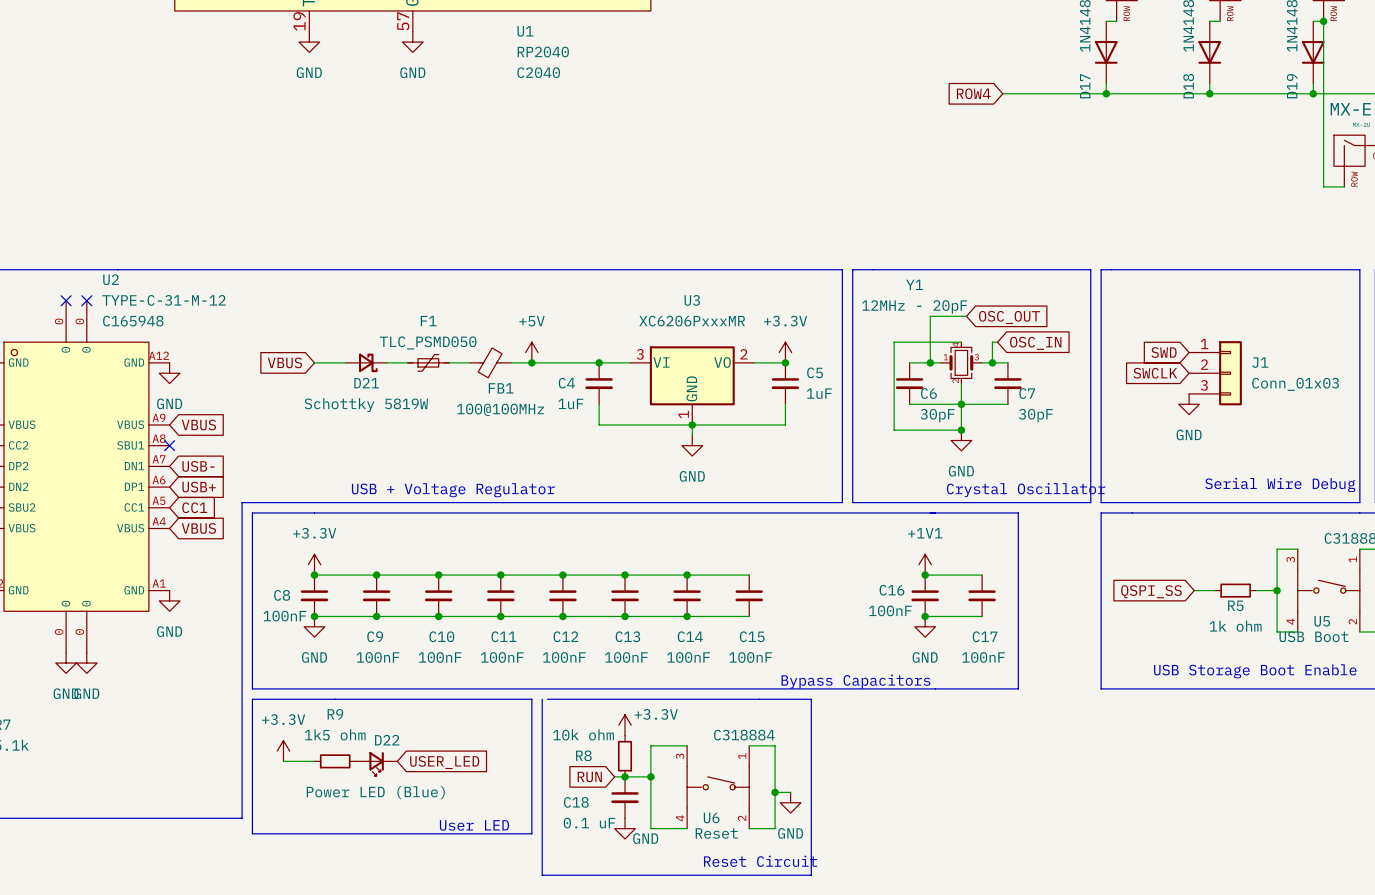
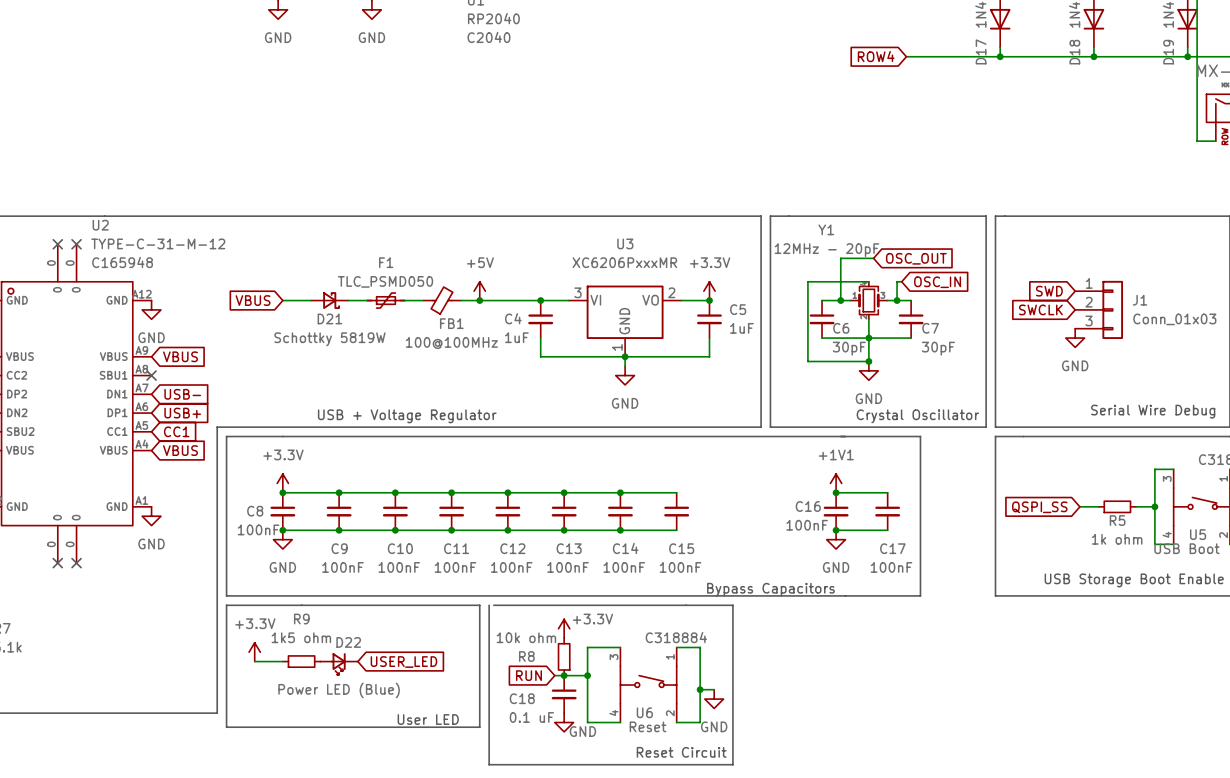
no-connect mark: none -> (57, 563)
no-connect mark: none -> (76, 563)
power symbol: GND (66, 663) -> none
power symbol: GND (86, 663) -> none

